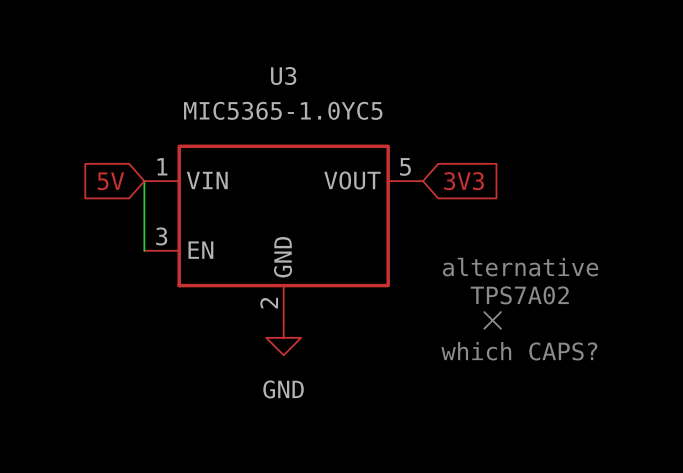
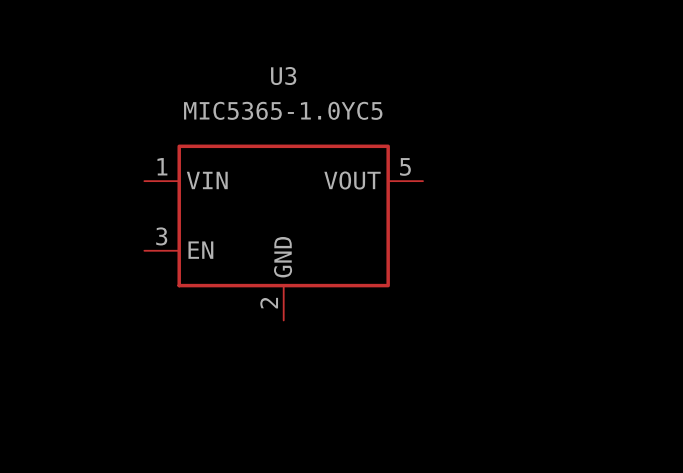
global label: 5V (110, 181) -> none
wire: (144, 181) (144, 250) -> none
global label: 3V3 (464, 181) -> none
text: alternative (520, 267) -> none
text: TPS7A02 (519, 295) -> none
no-connect mark: (492, 320) -> none
power symbol: GND (283, 337) -> none
text: which CAPS? (519, 351) -> none

